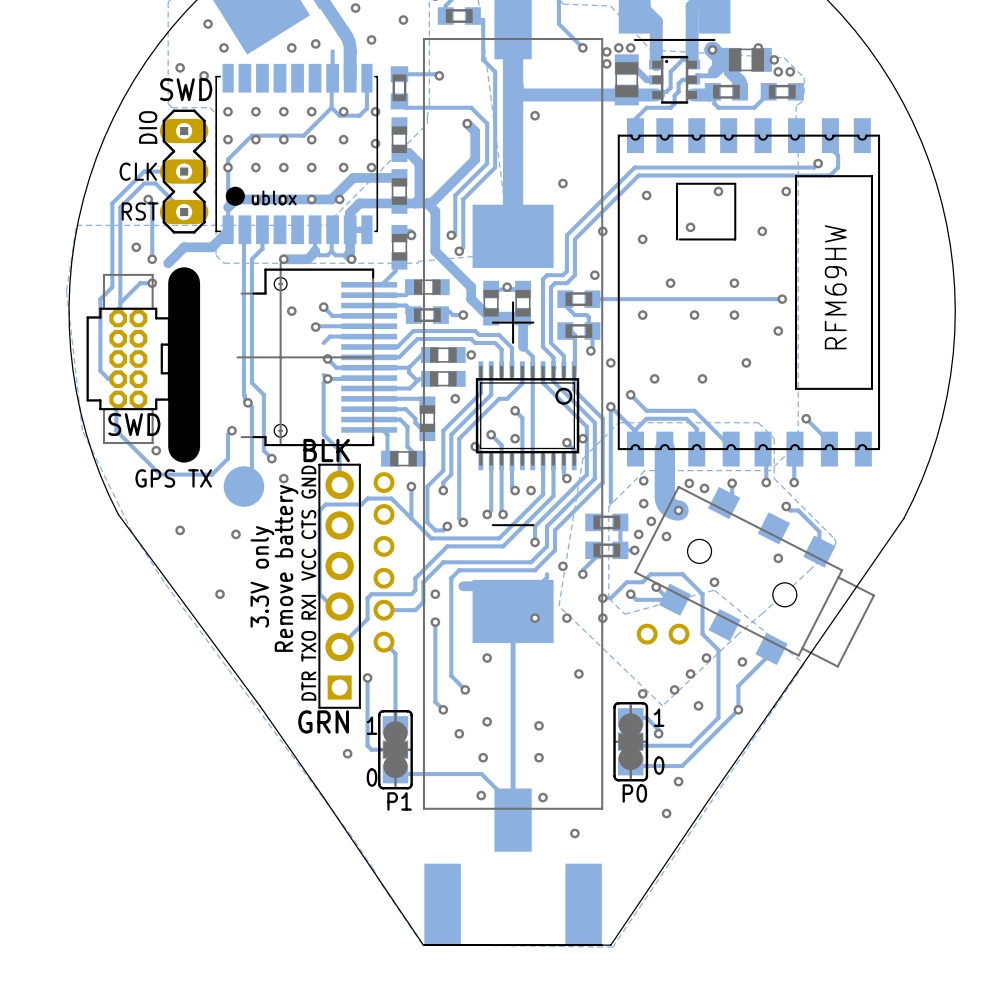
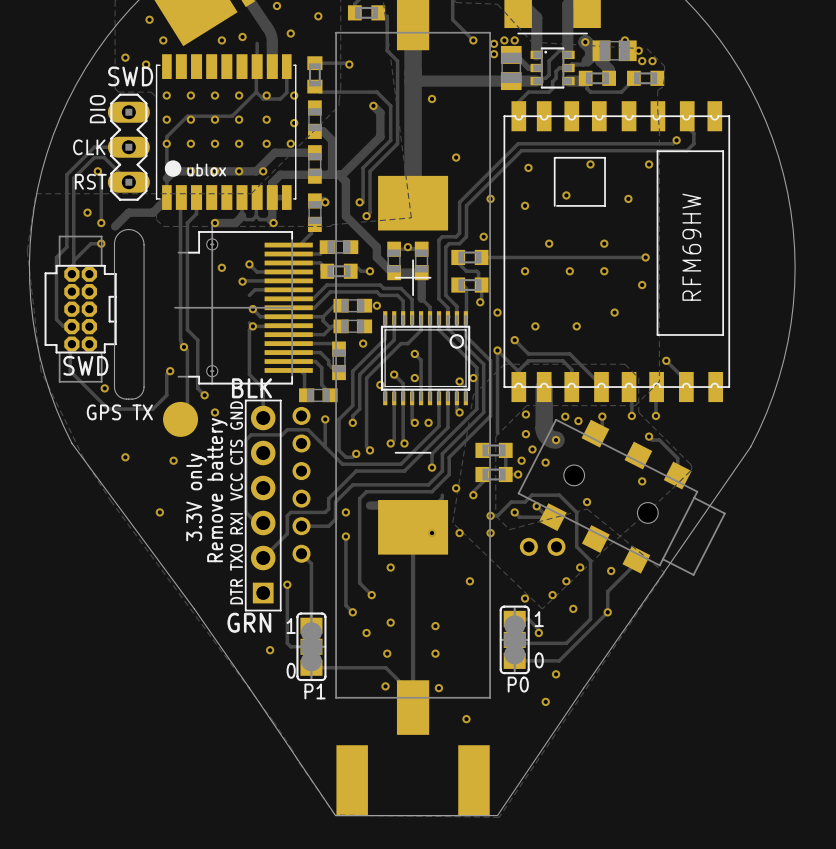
board edge: none -> (128, 229) (118, 233) (114, 241) (114, 387) (119, 396) (131, 399) (140, 395) (143, 388) (144, 244) (139, 234) (128, 229)
board edge: (184, 283) (184, 446) -> none

